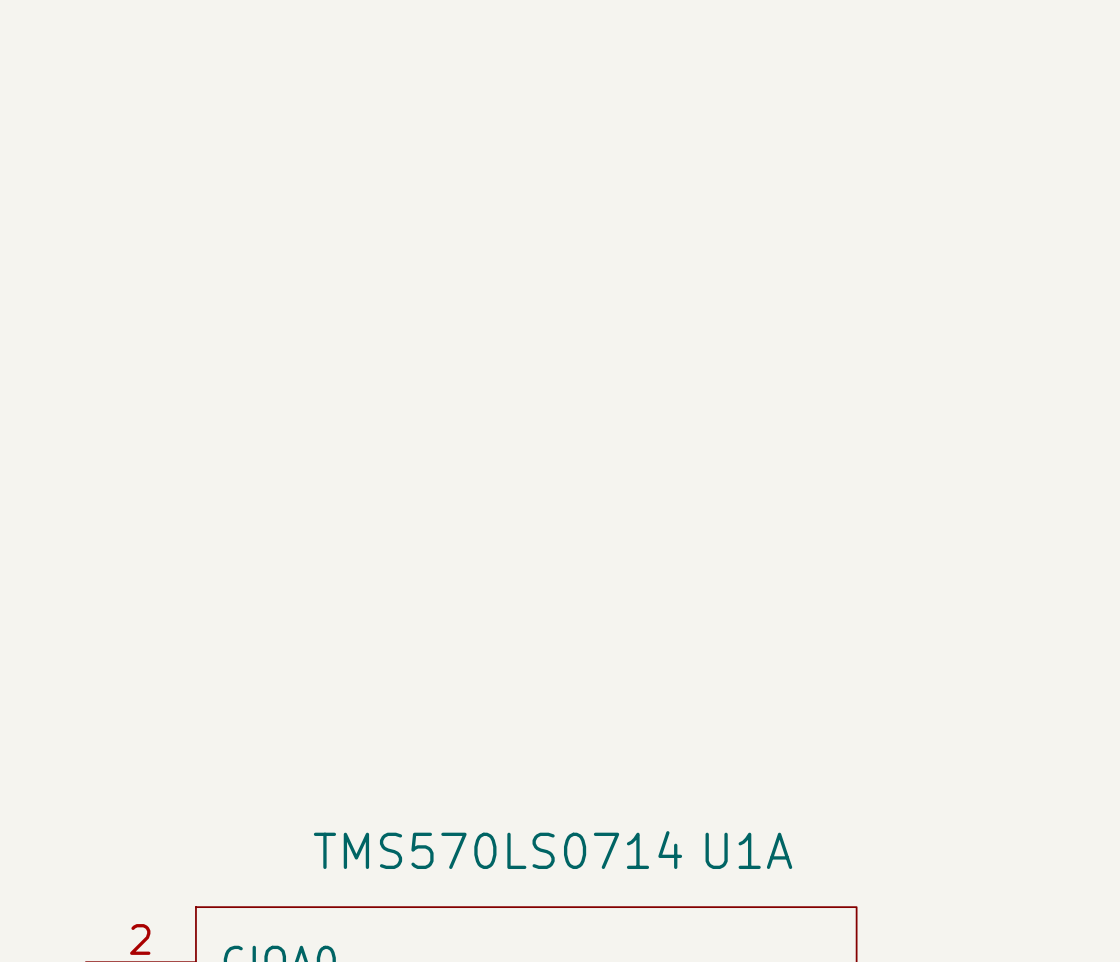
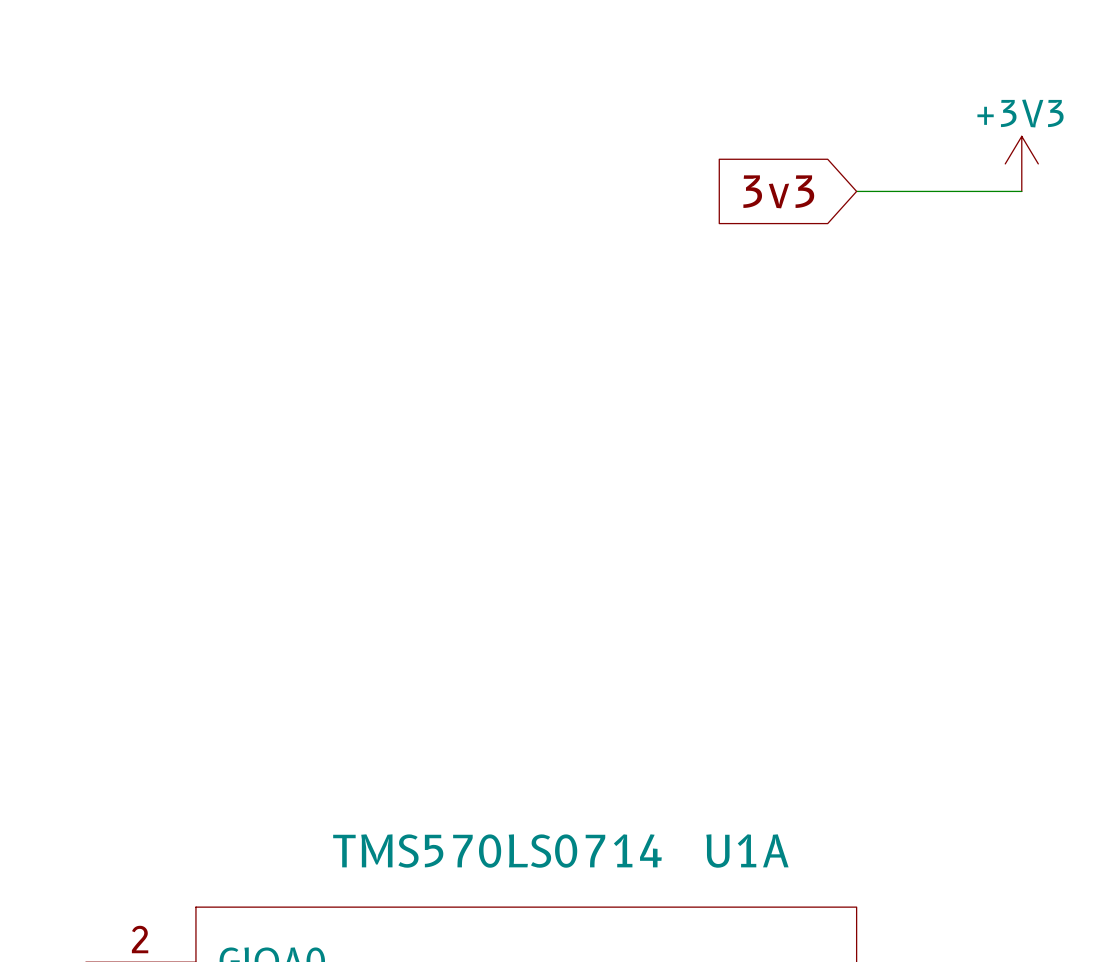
power symbol: none -> +3V3 (1021, 163)
global label: none -> 3v3 (778, 191)
wire: none -> (856, 191) (1021, 191)

